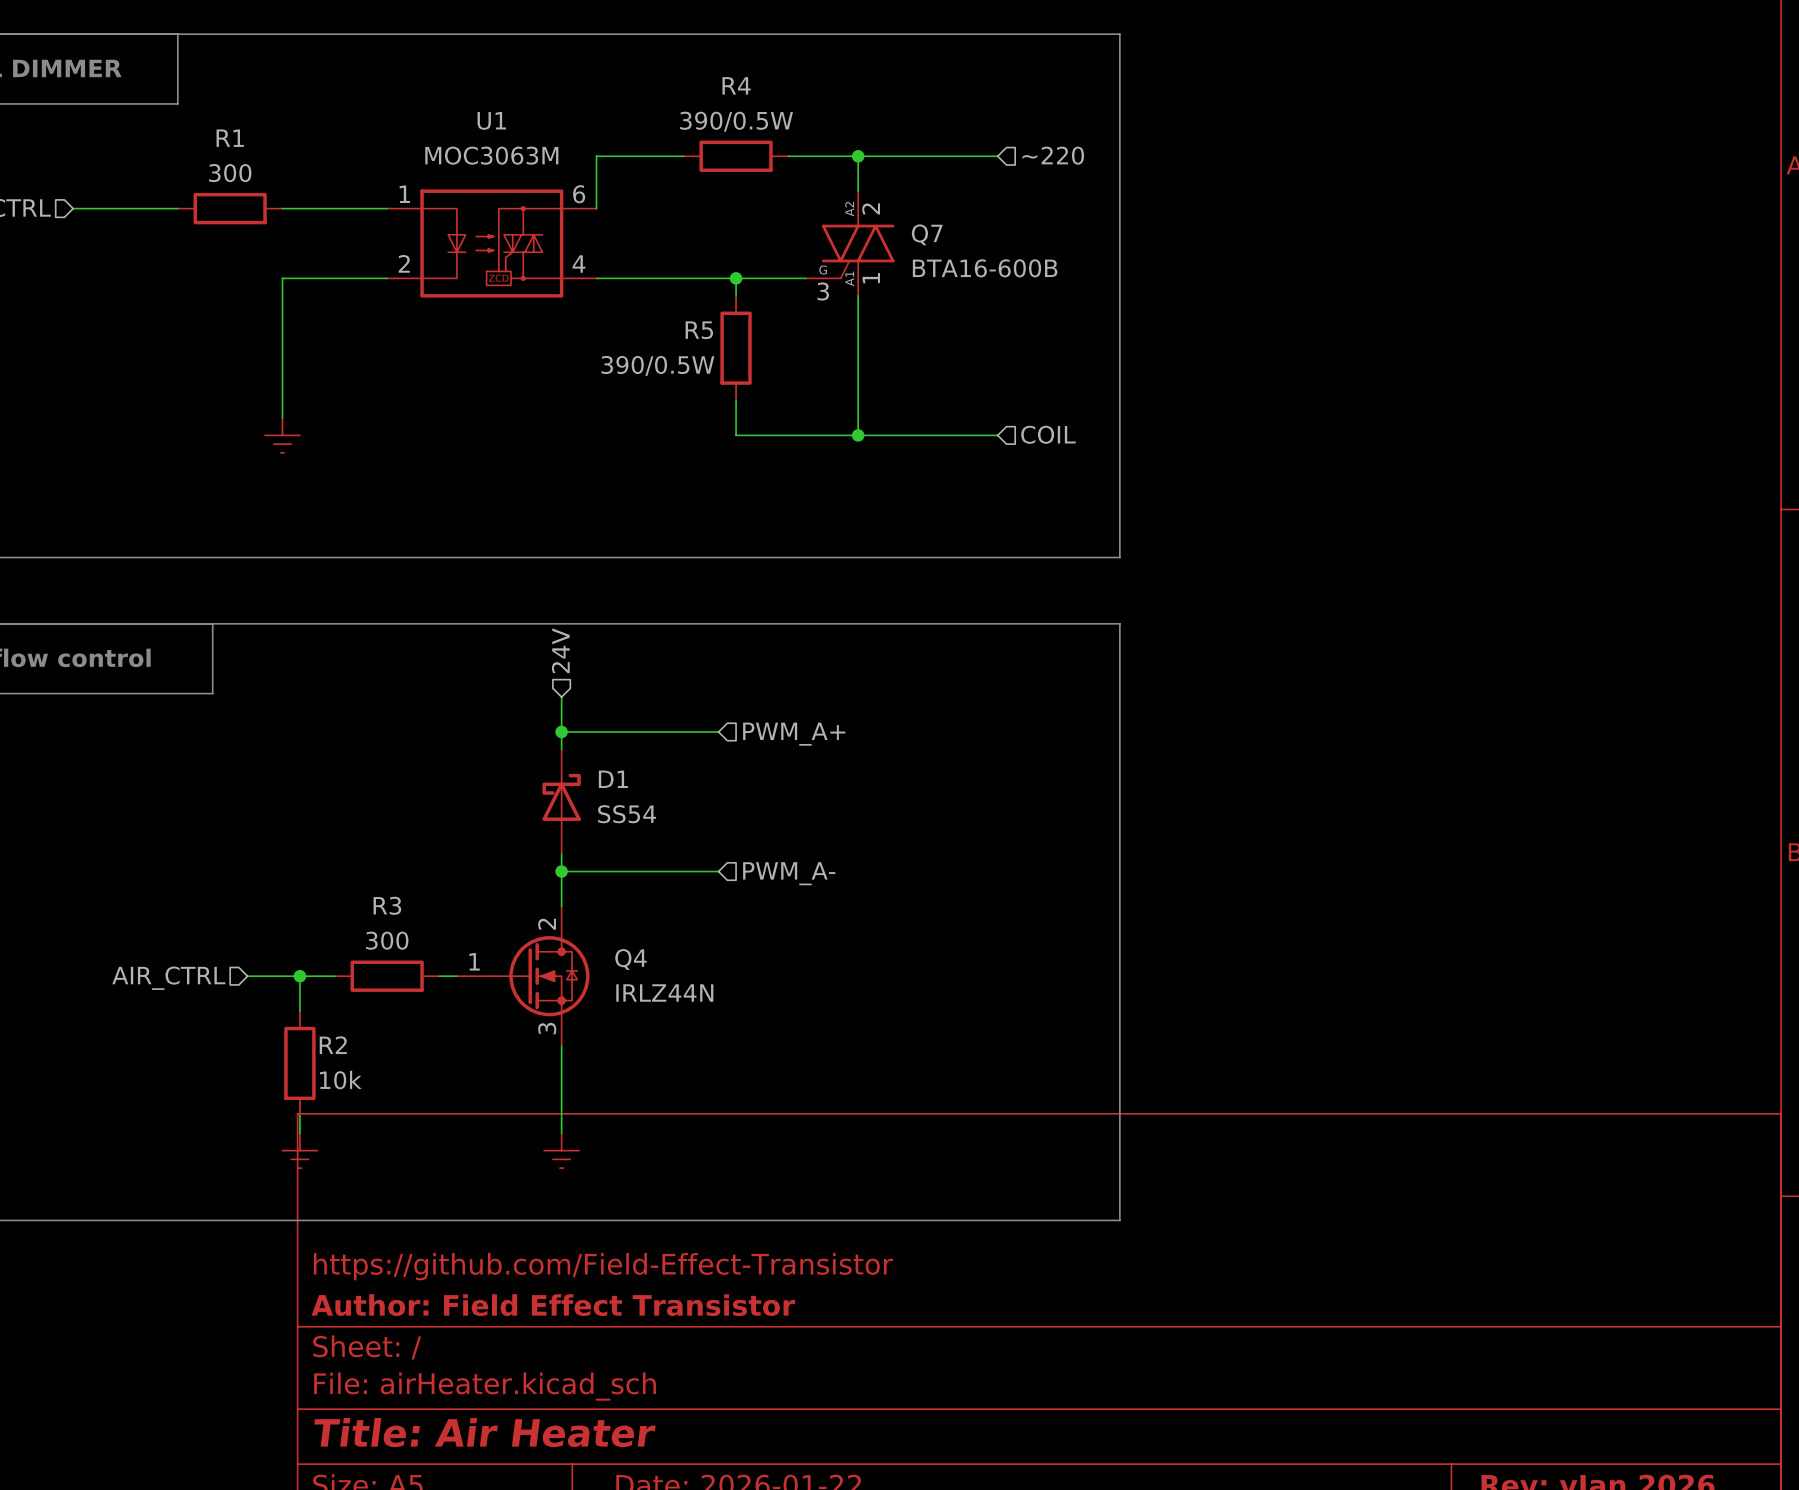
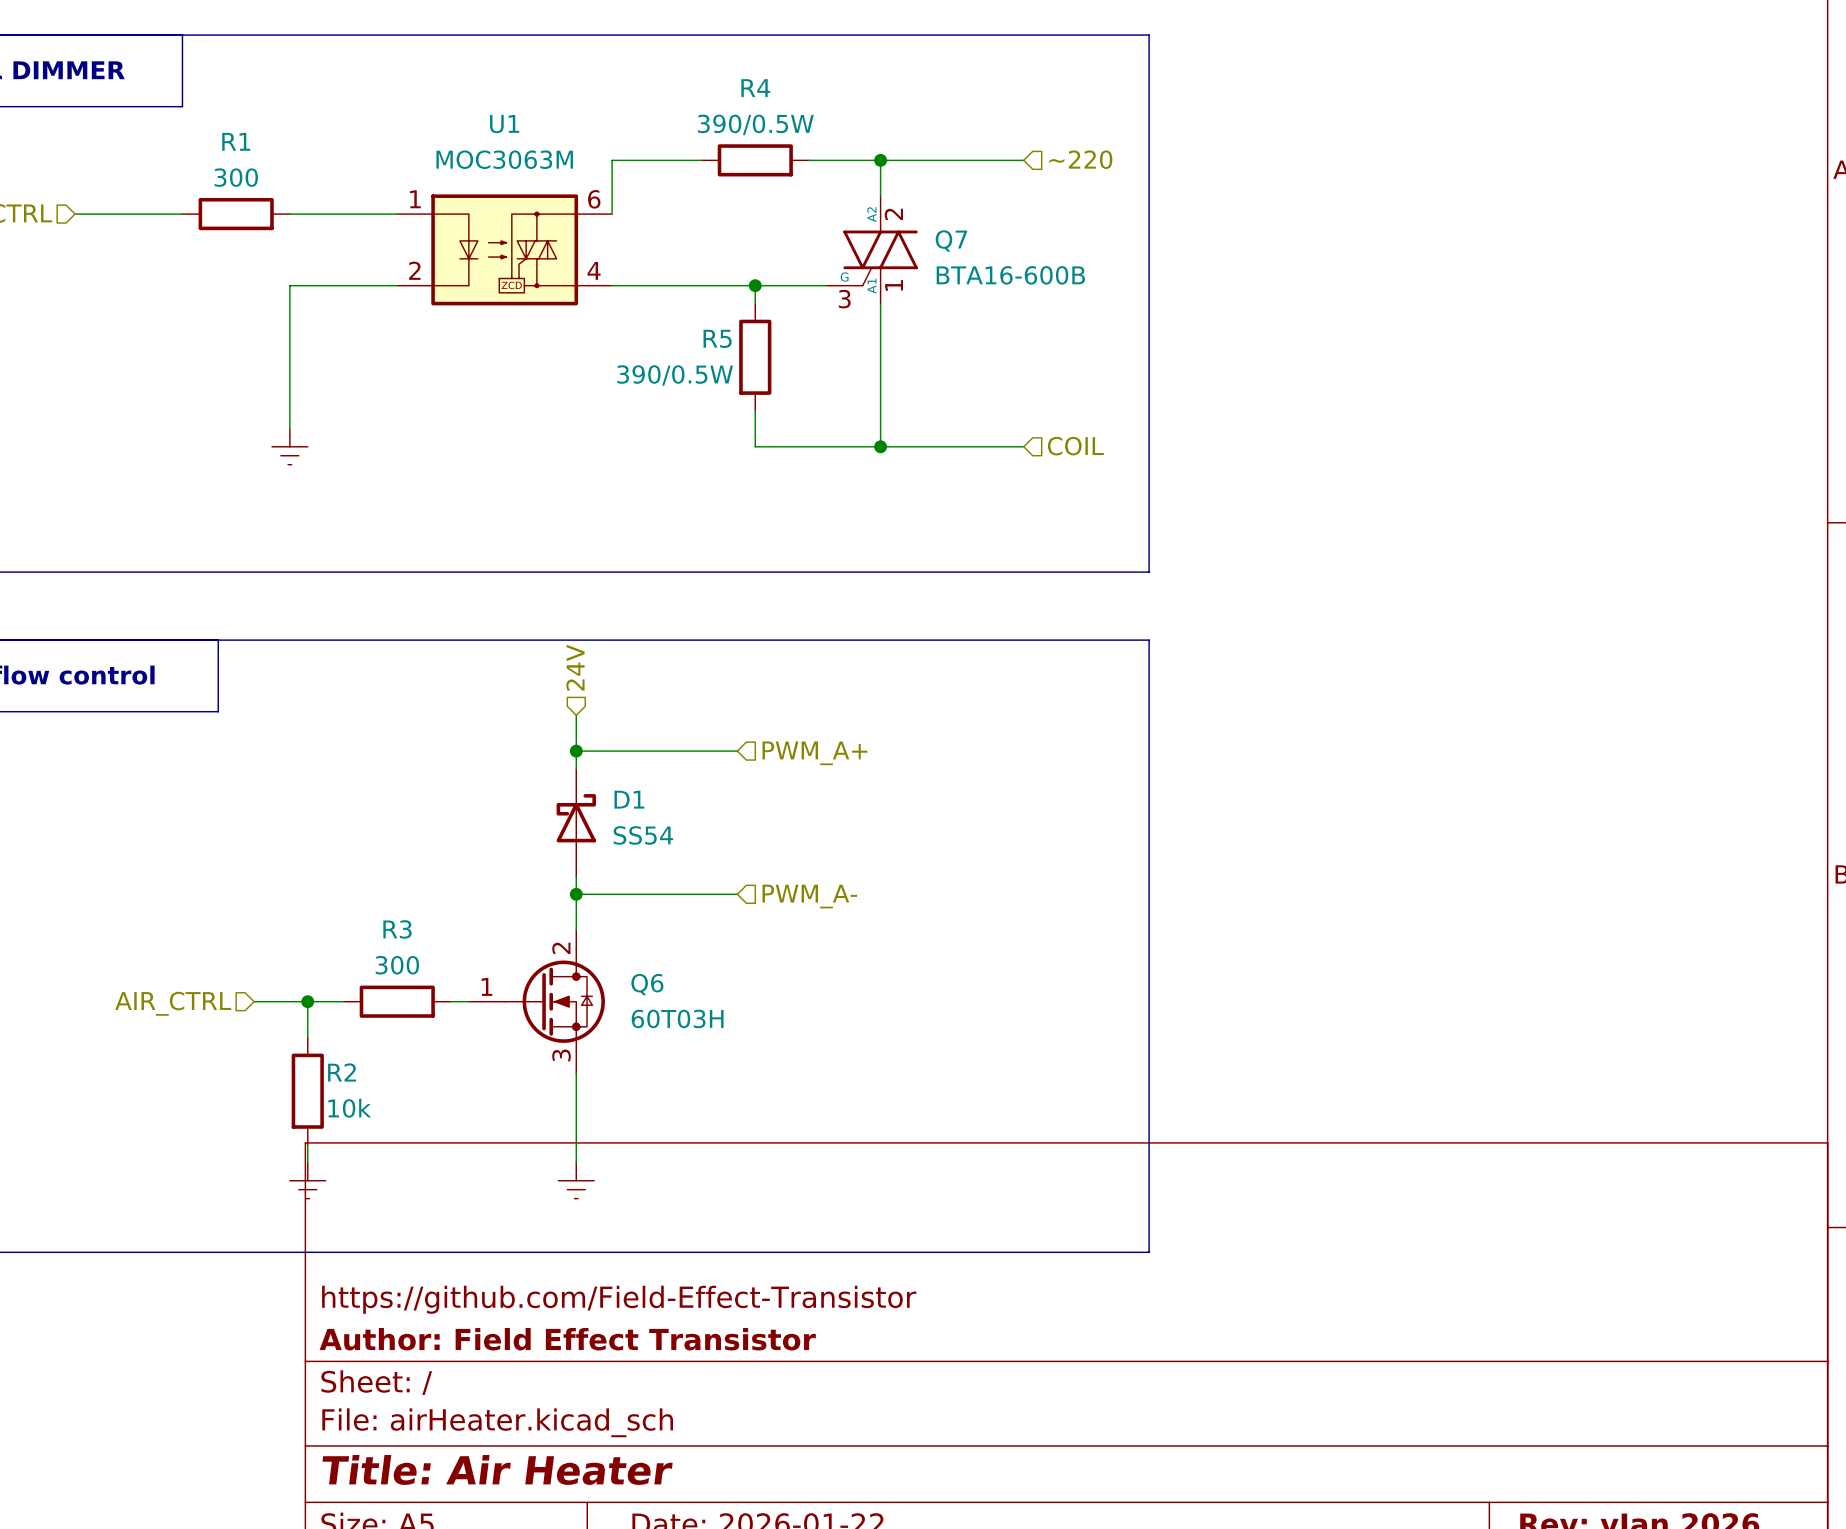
Q4 name: Q4 (630, 959) -> Q6 (647, 984)
Q4 value: IRLZ44N (664, 993) -> 60T03H (677, 1018)

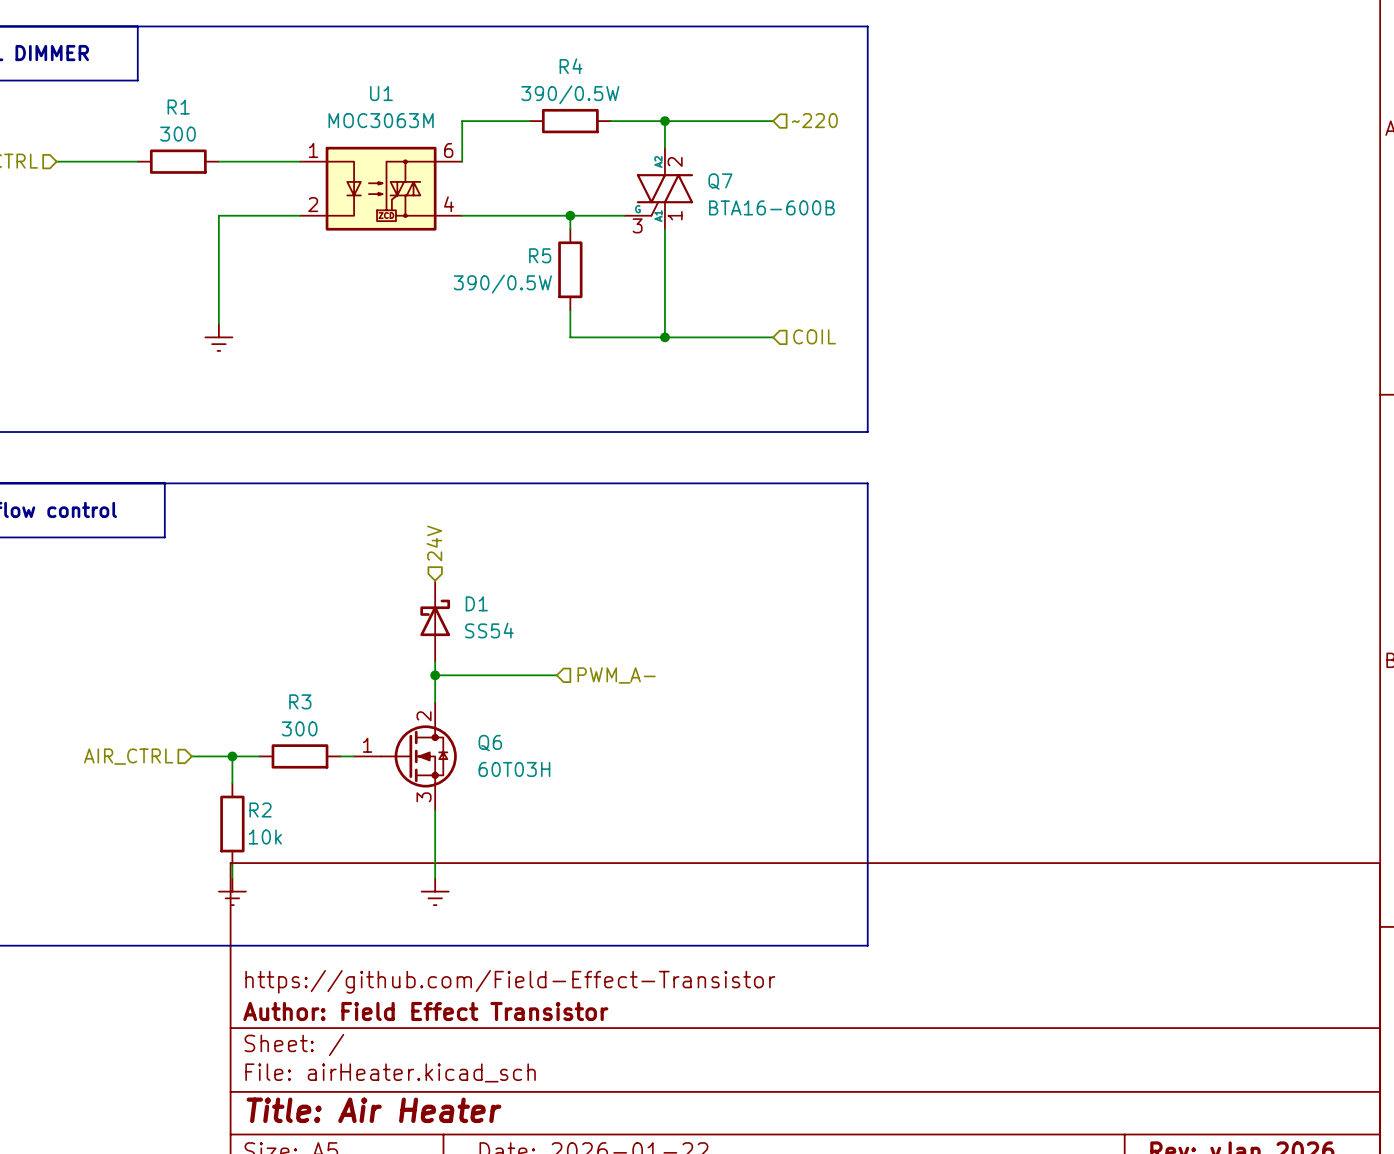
hierarchical label position: 24V (575, 667) -> 24V (434, 543)
wire: (576, 715) (576, 768) -> none
wire: (576, 751) (737, 751) -> none
junction: (576, 751) -> none
hierarchical label: PWM_A+ (814, 753) -> none

